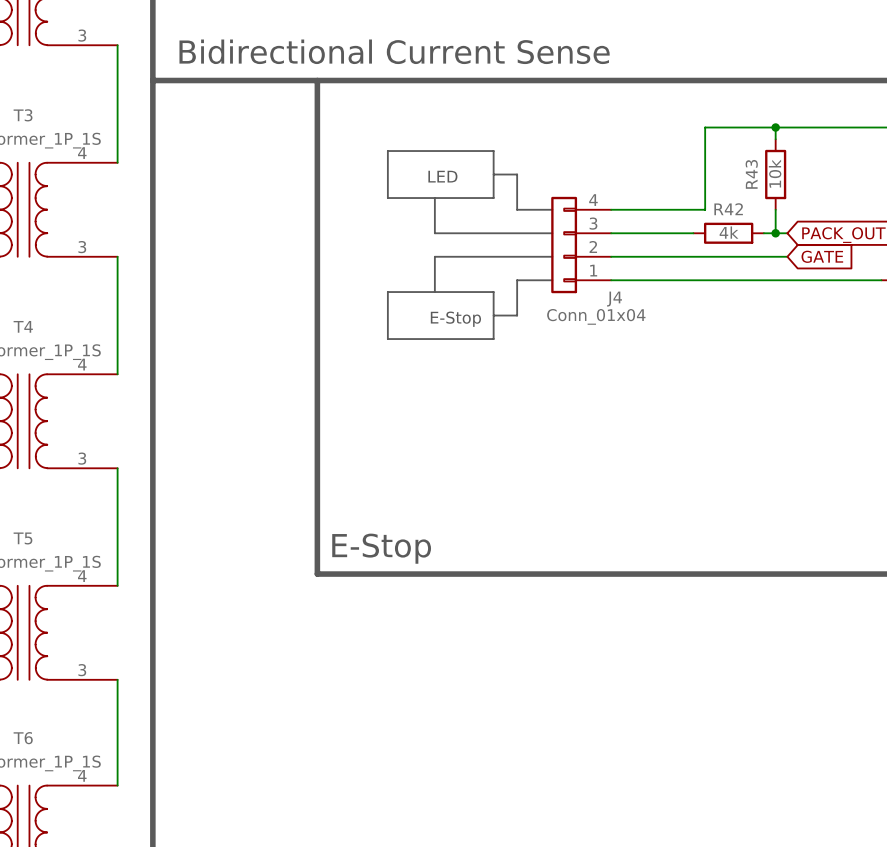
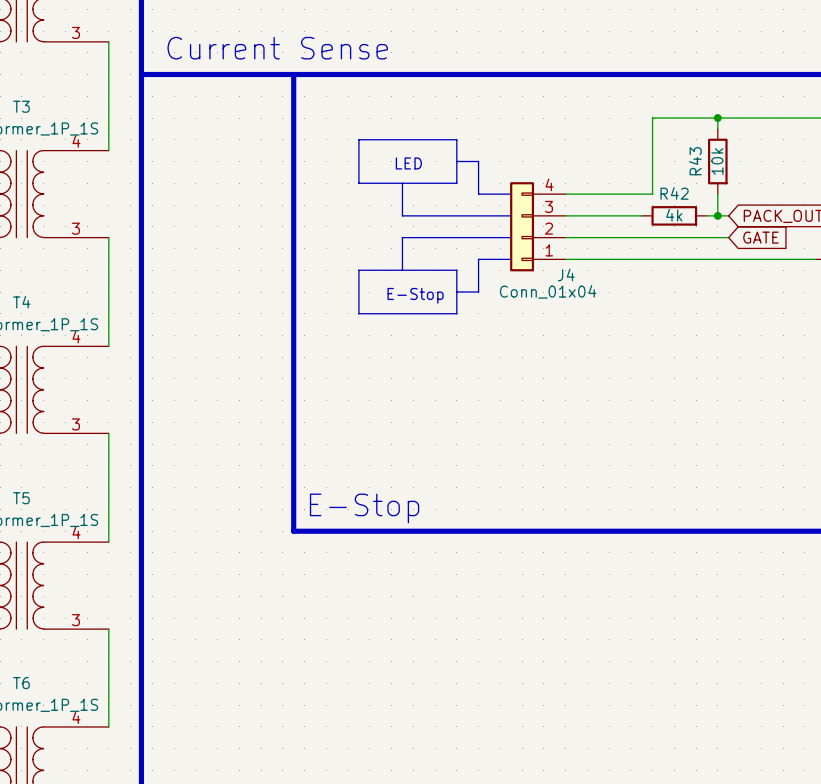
text: Bidirectional Current Sense (394, 51) -> Current Sense (277, 48)

